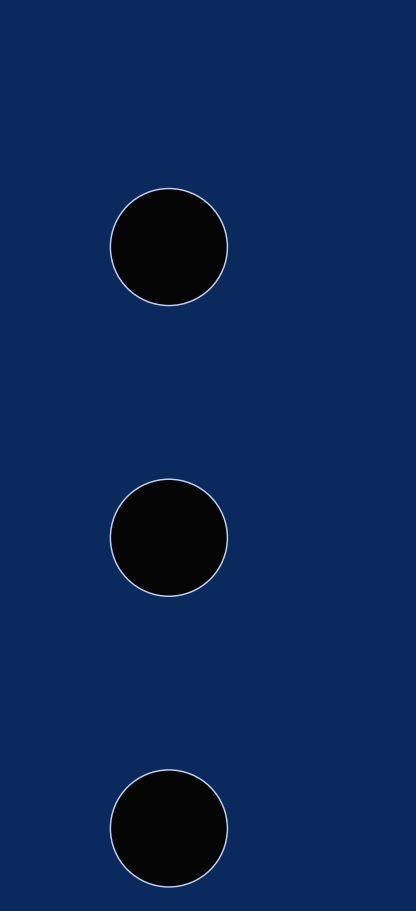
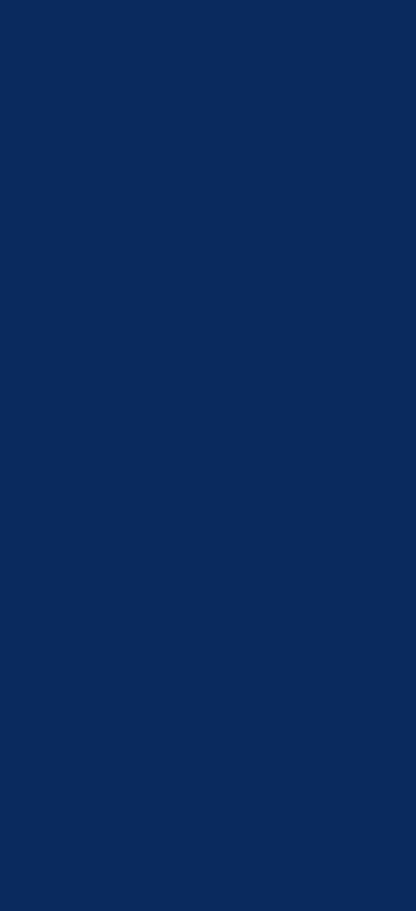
part: (168, 247) -> none
part: (168, 537) -> none
part: (168, 828) -> none

